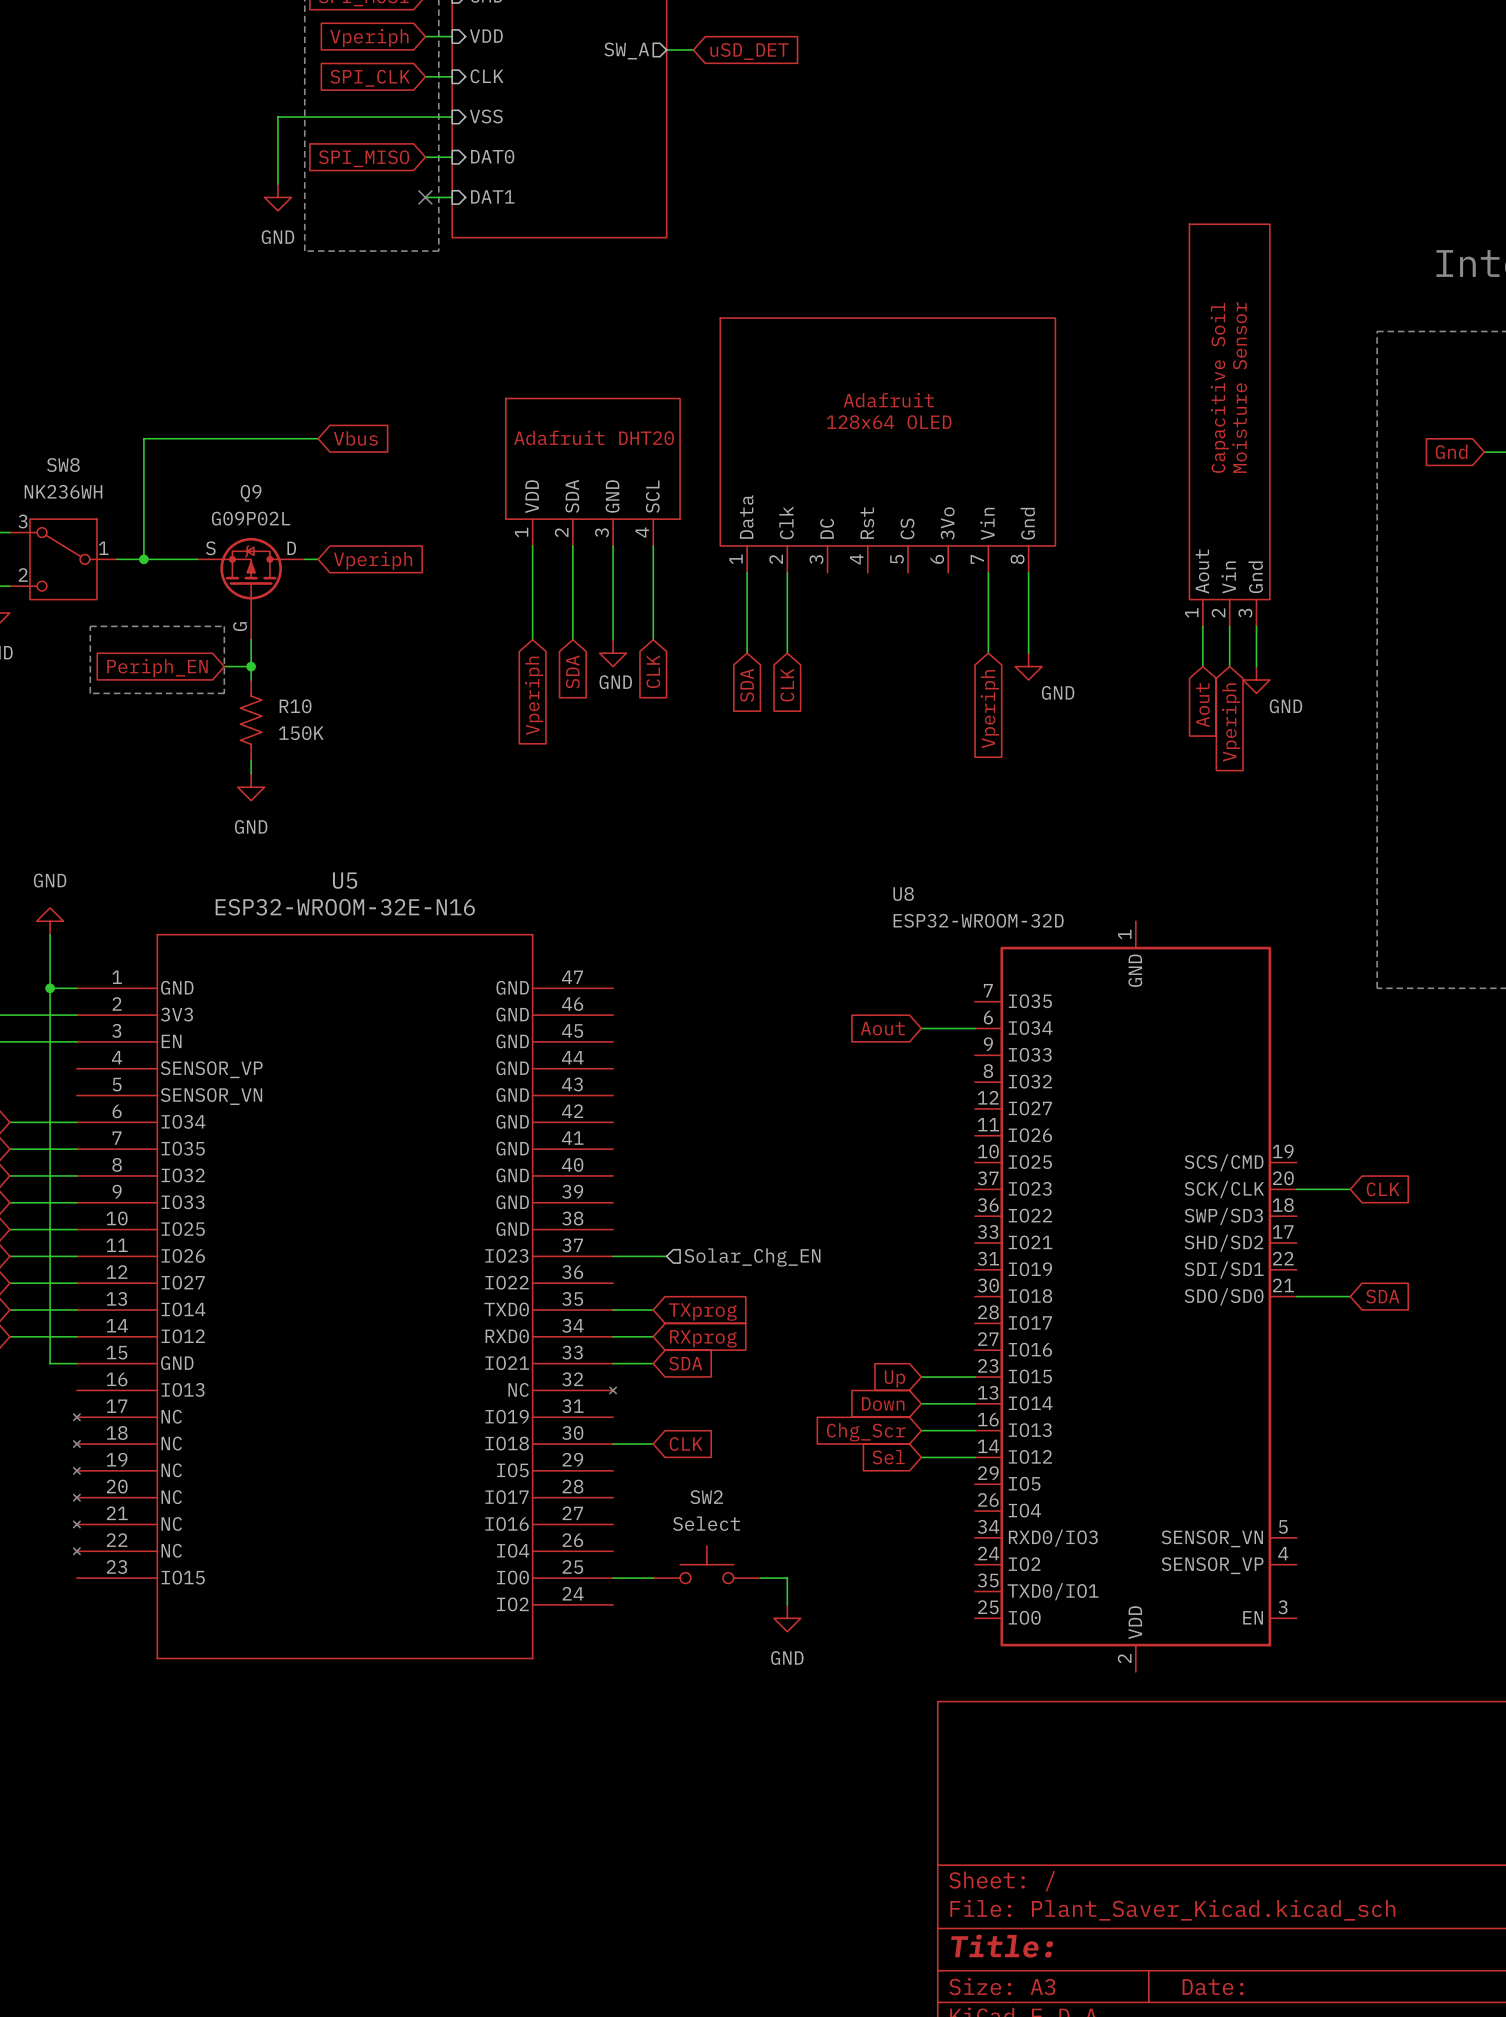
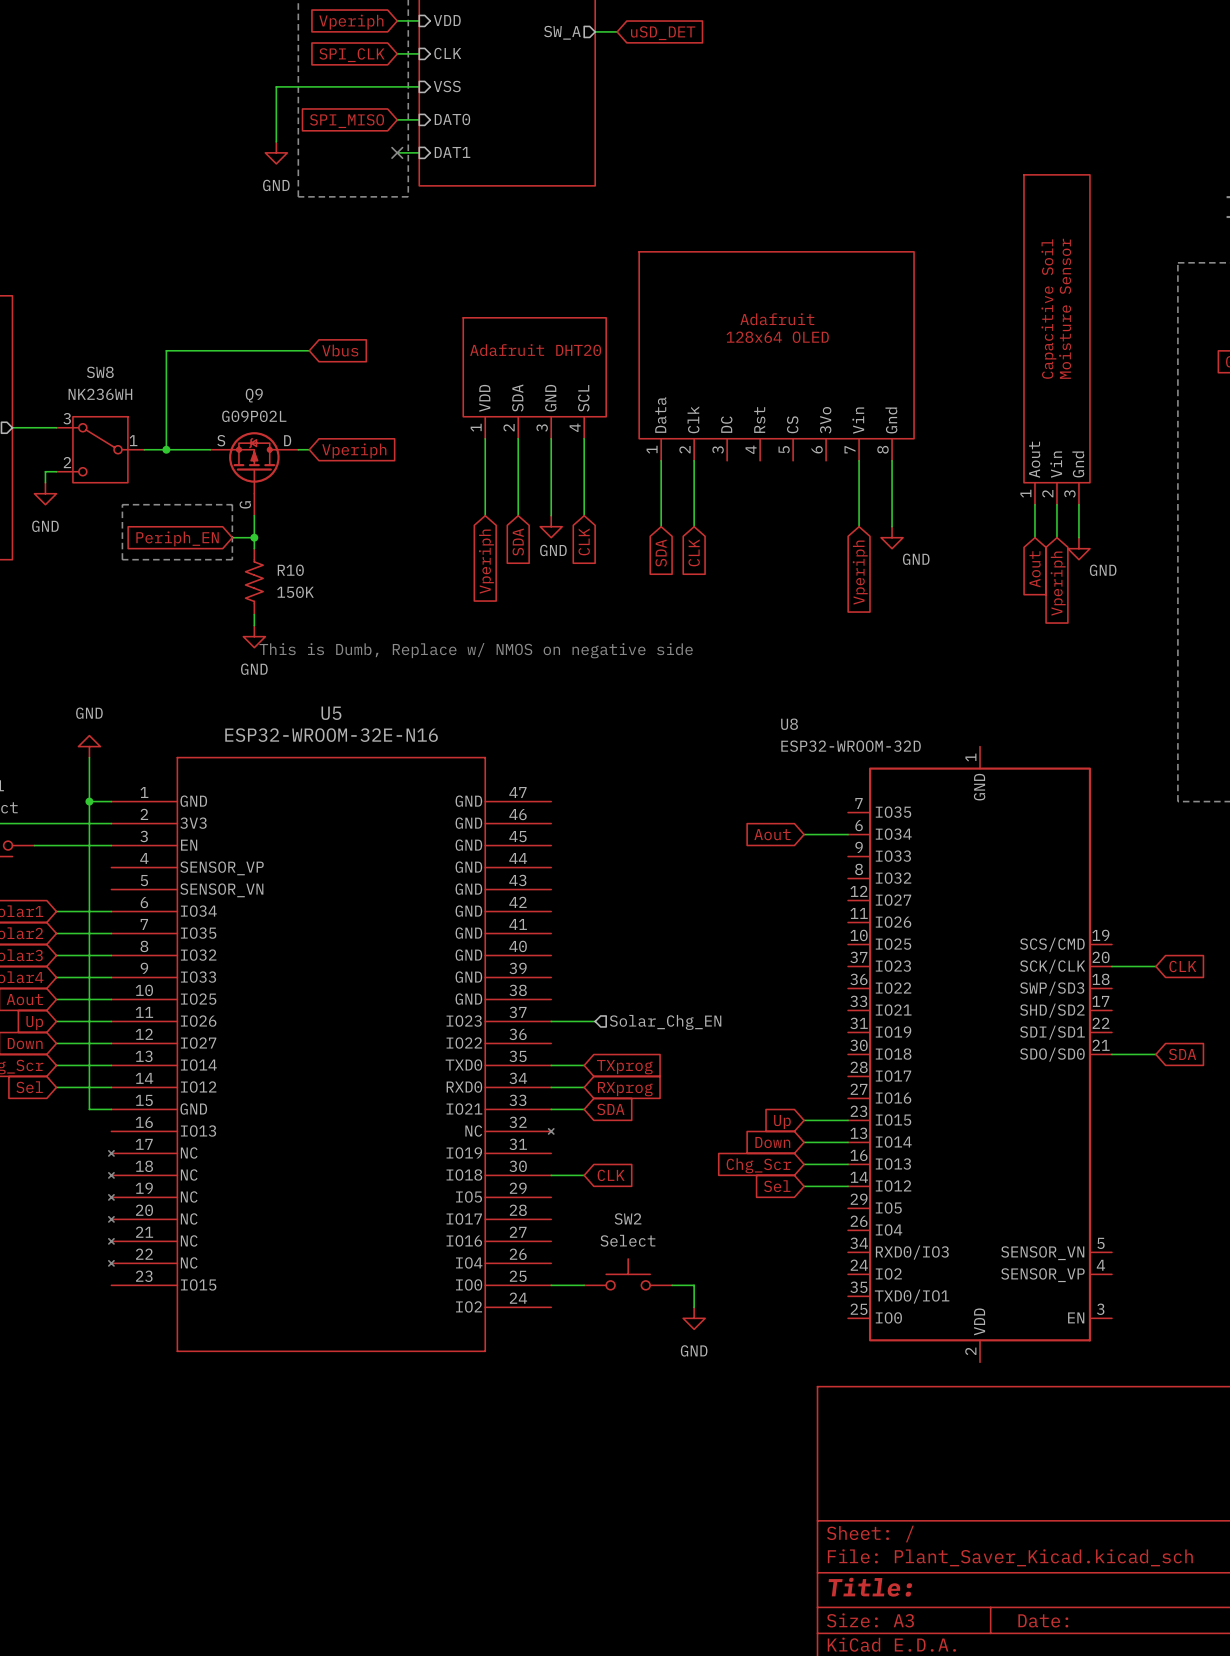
text: none -> This is Dumb, Replace w/ NMOS on negative side (476, 650)

